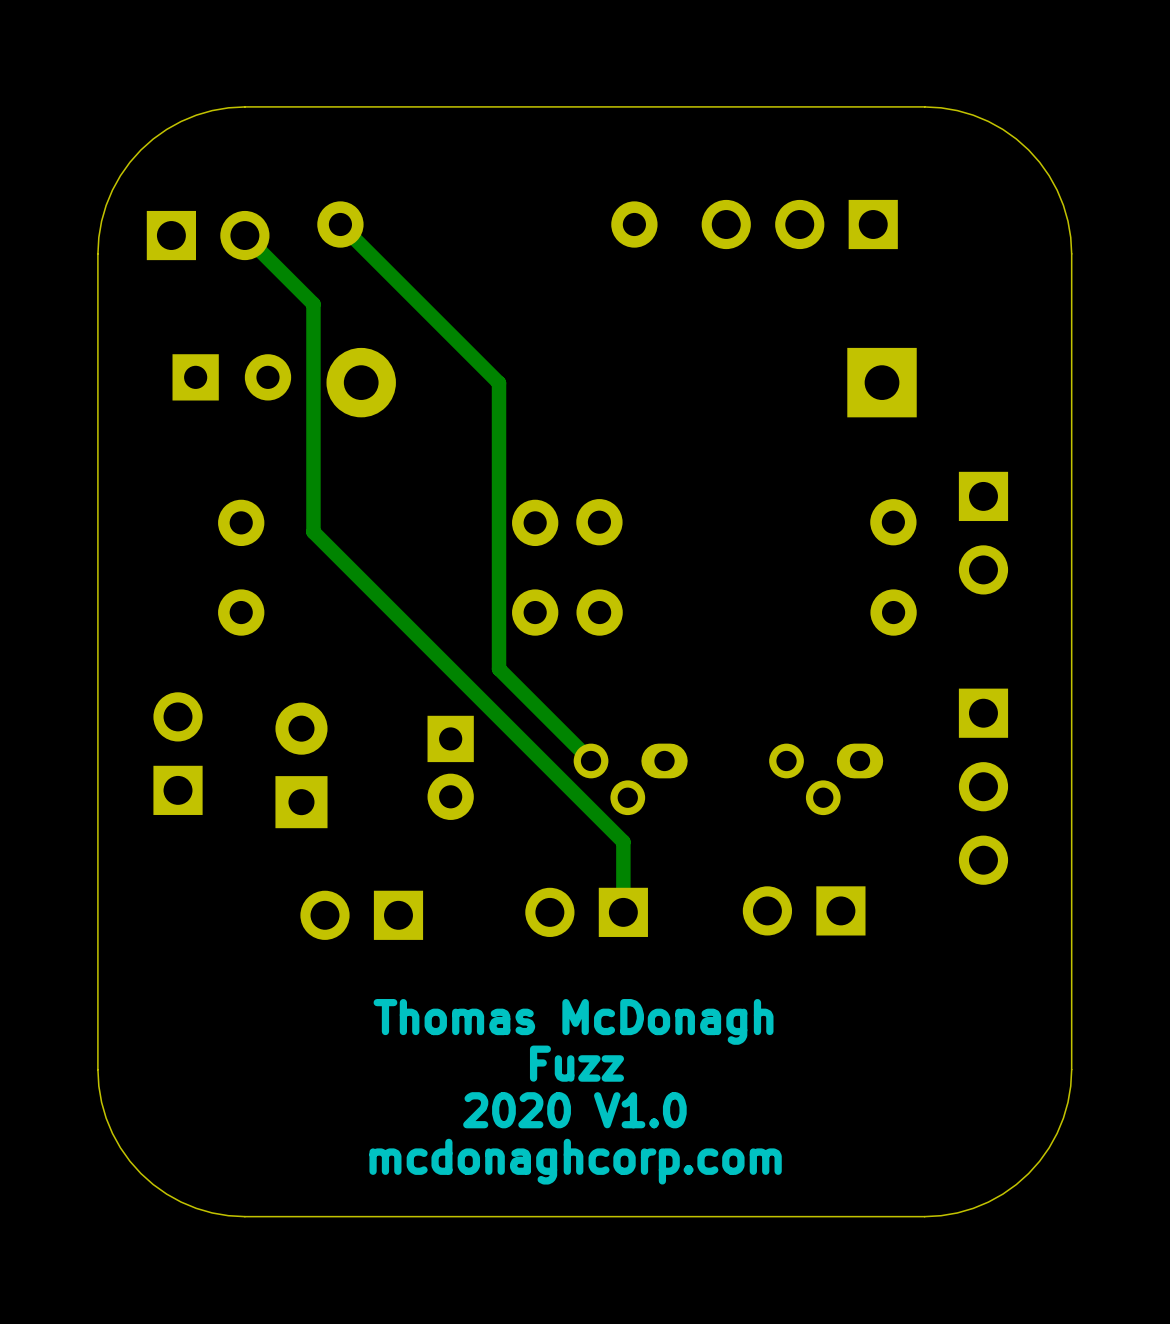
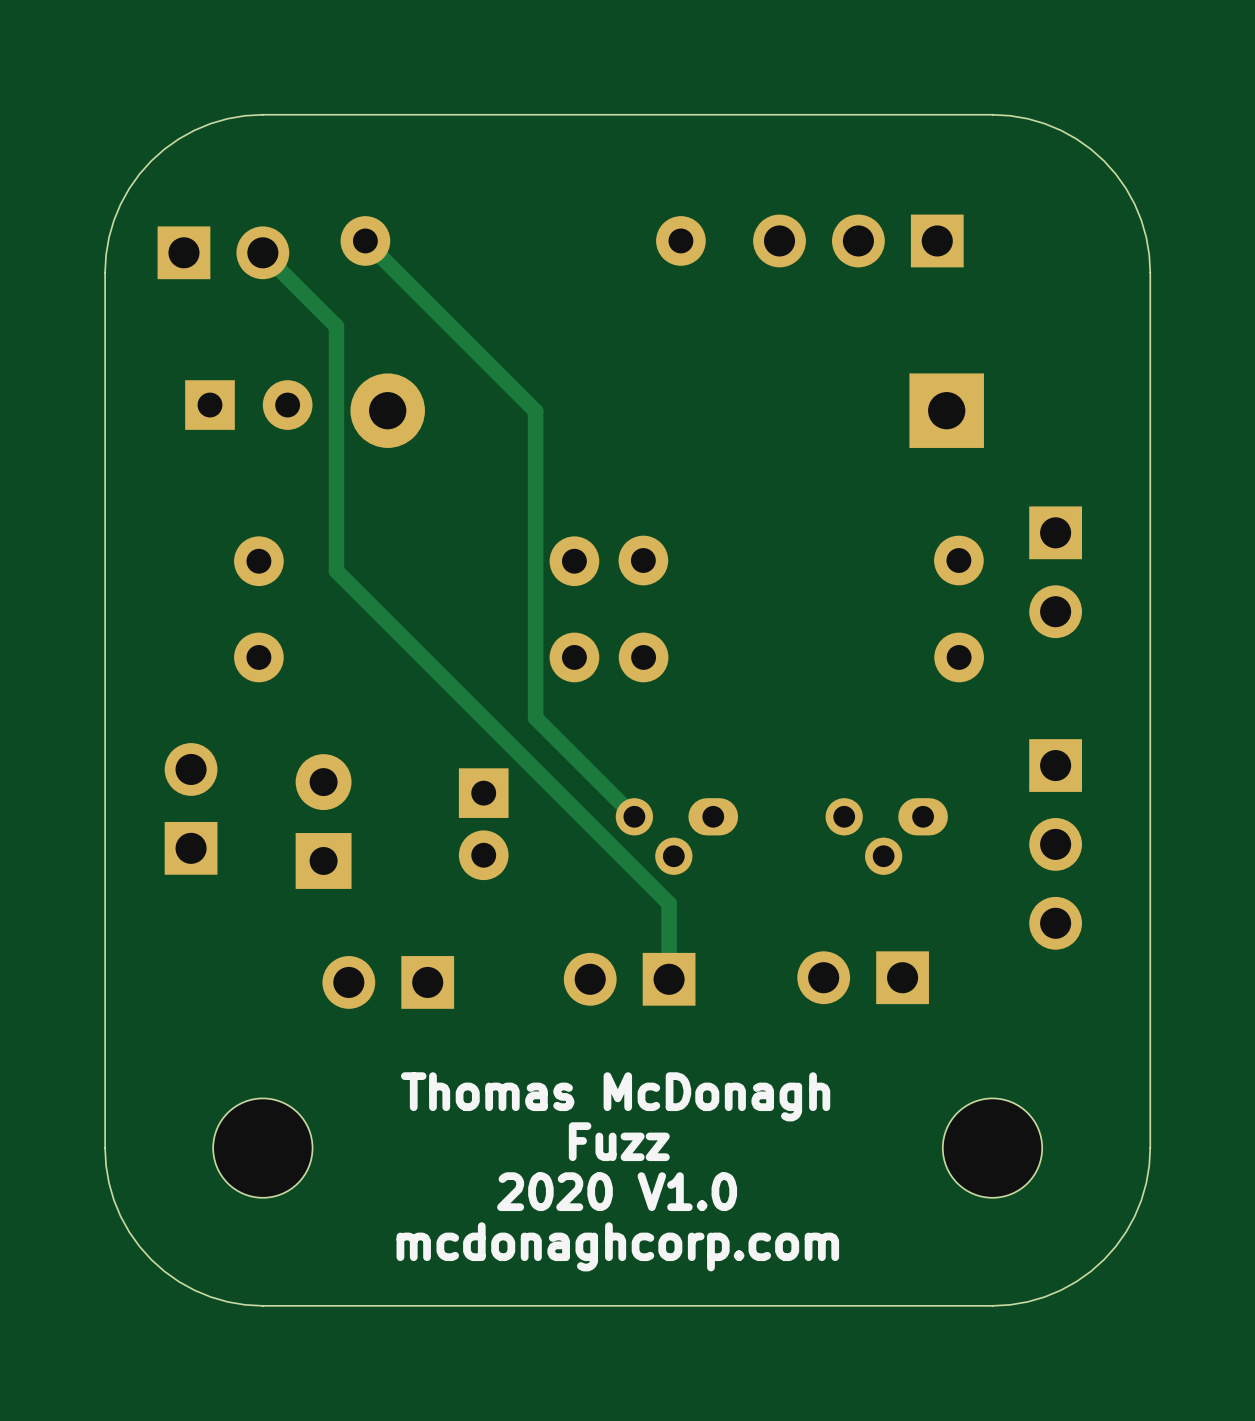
part: none -> (262, 1148)
part: none -> (992, 1148)

